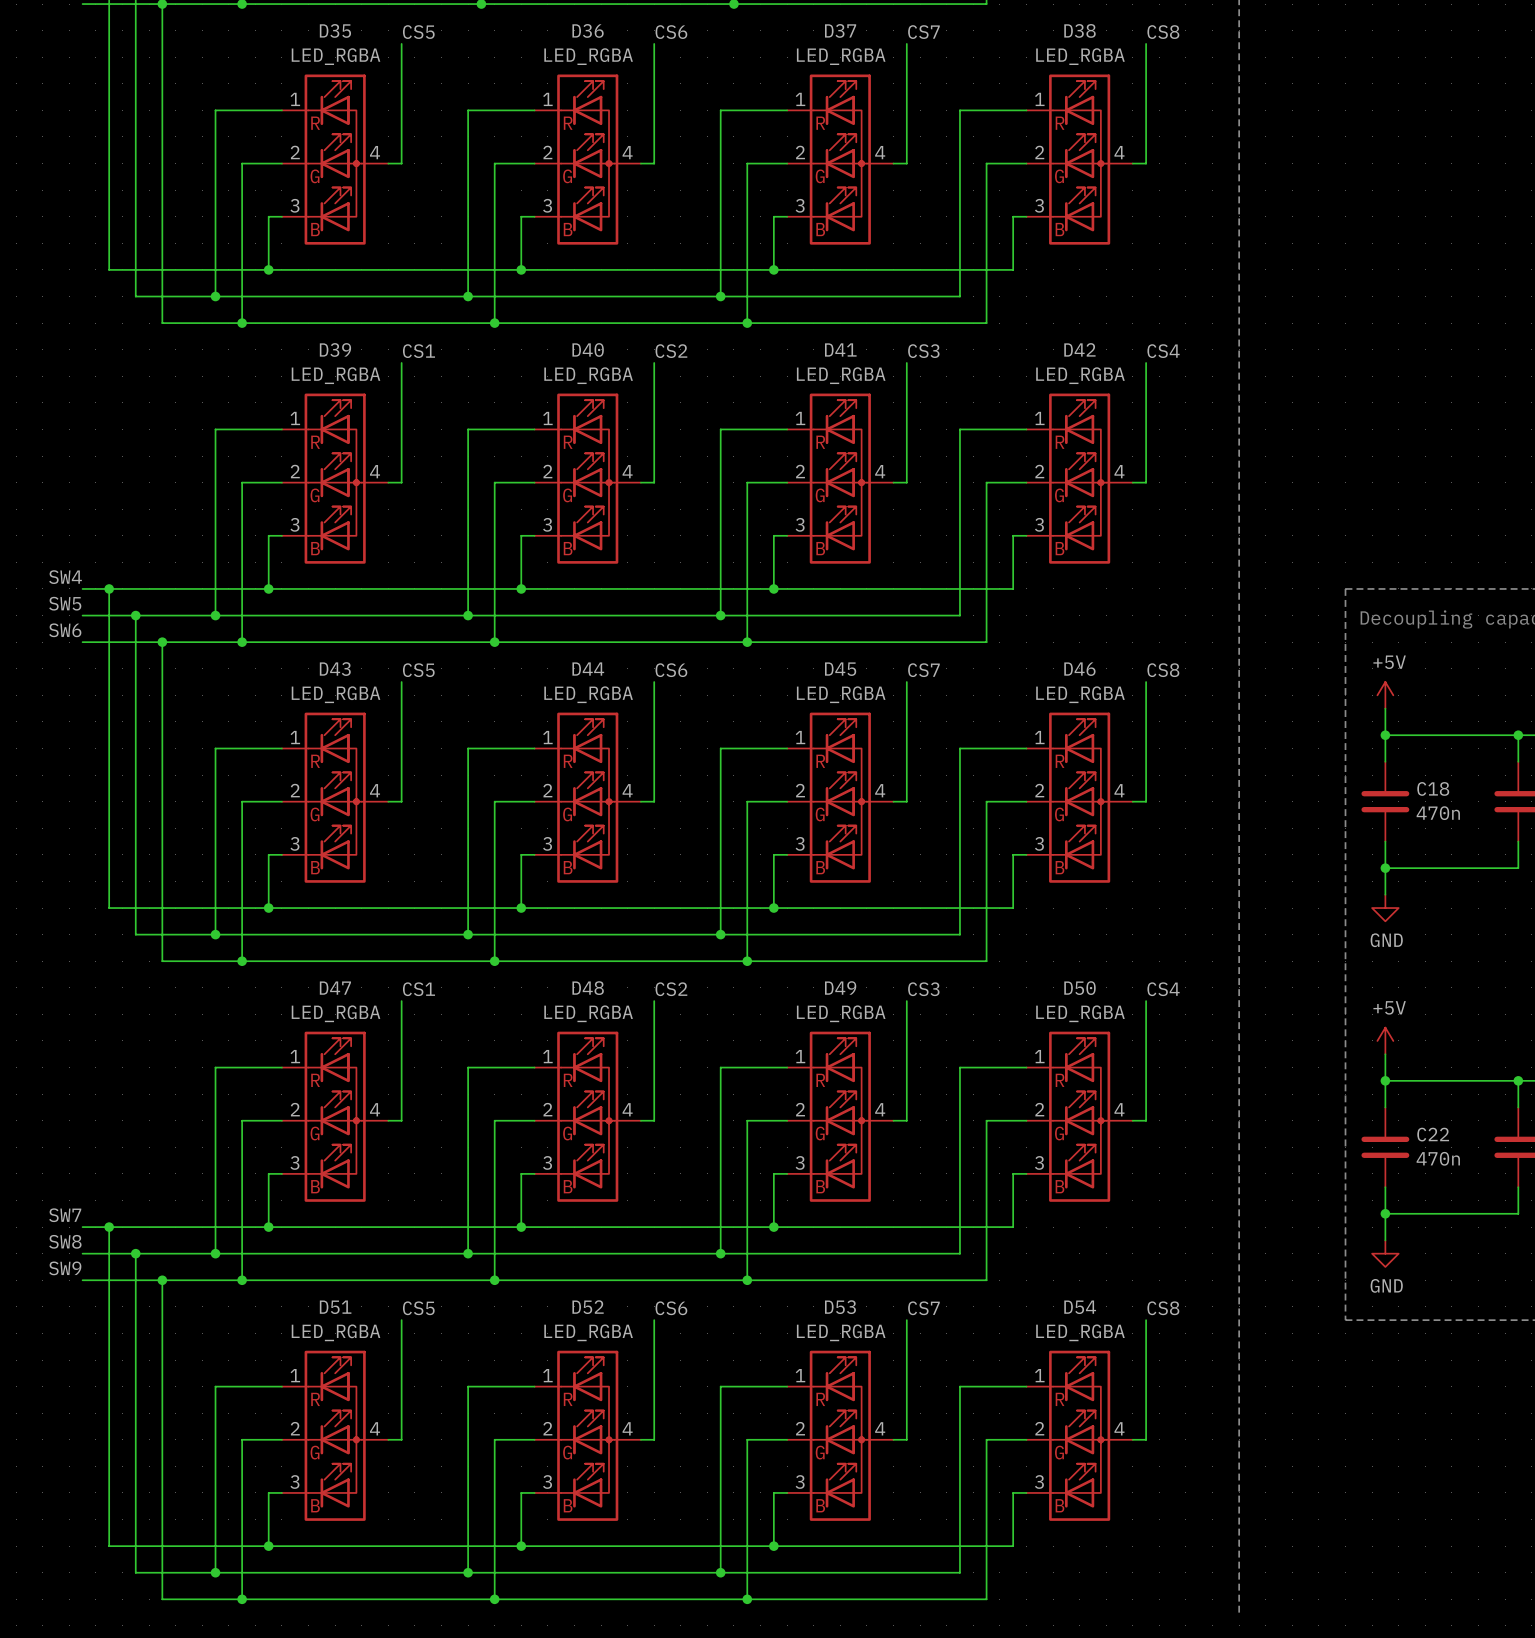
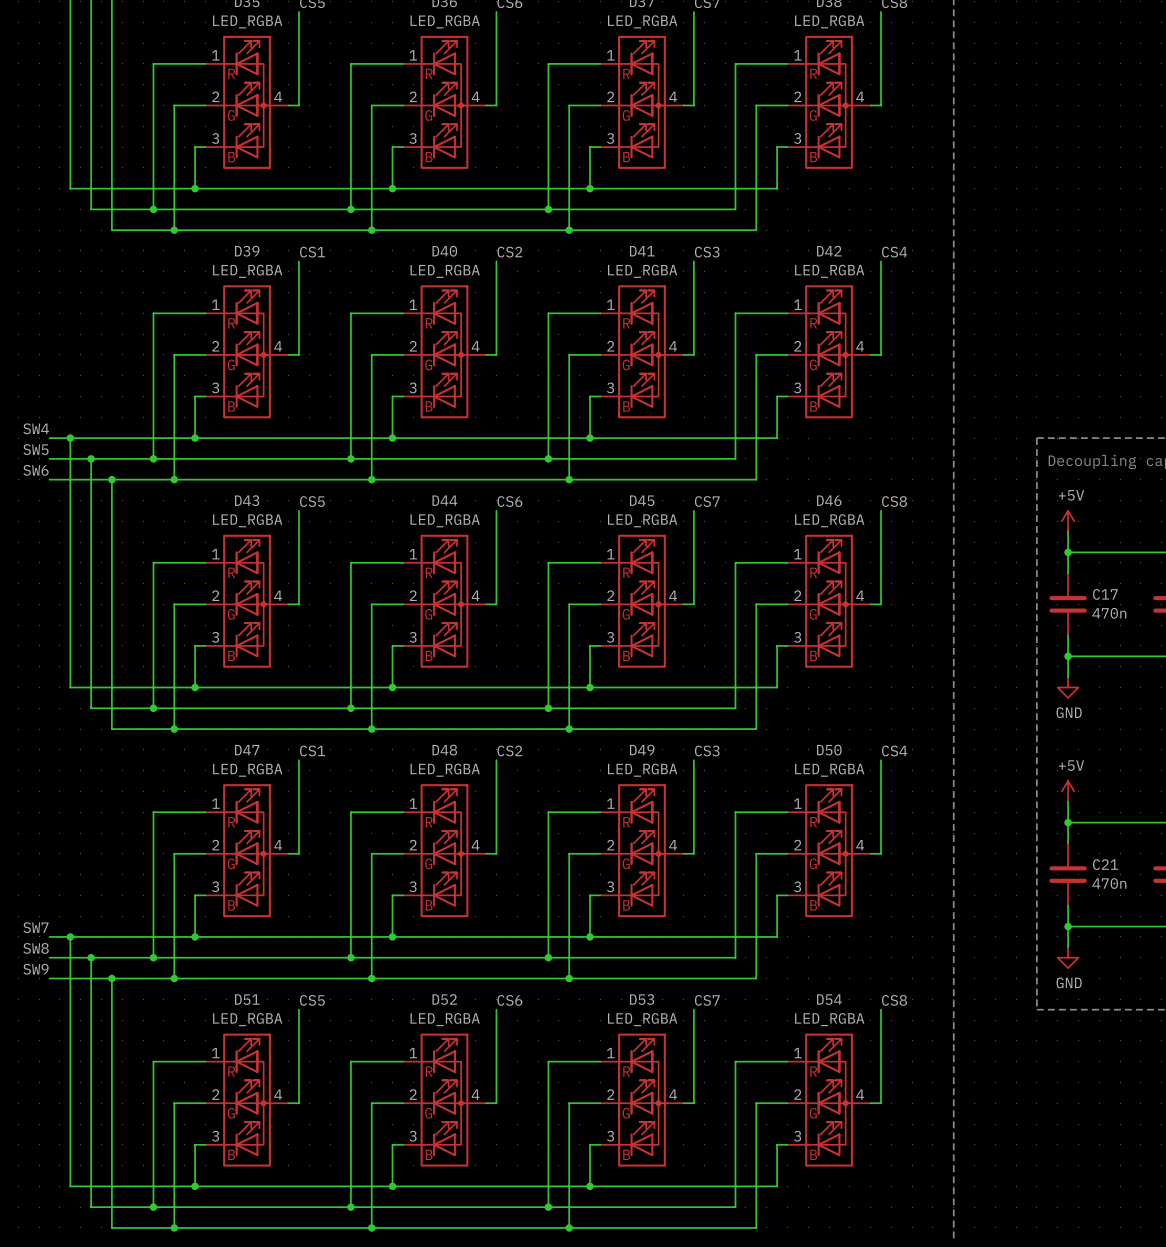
C18 name: C18 (1433, 788) -> C17 (1105, 594)
C22 name: C22 (1433, 1134) -> C21 (1105, 864)

